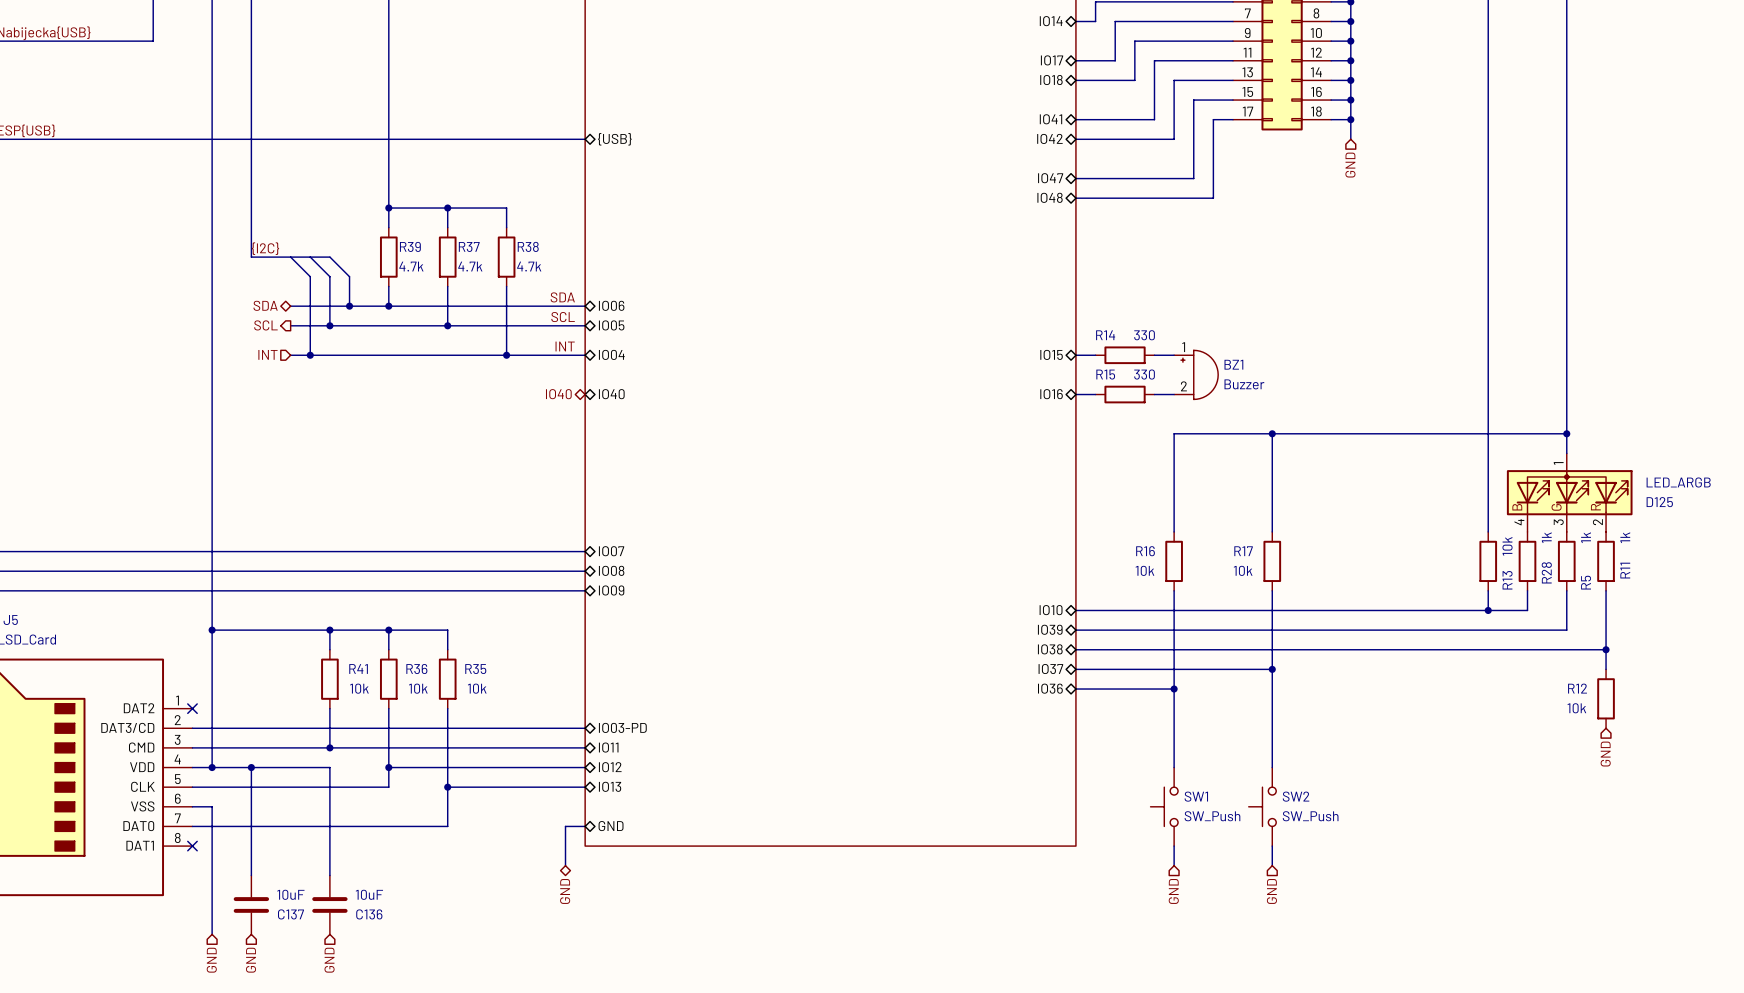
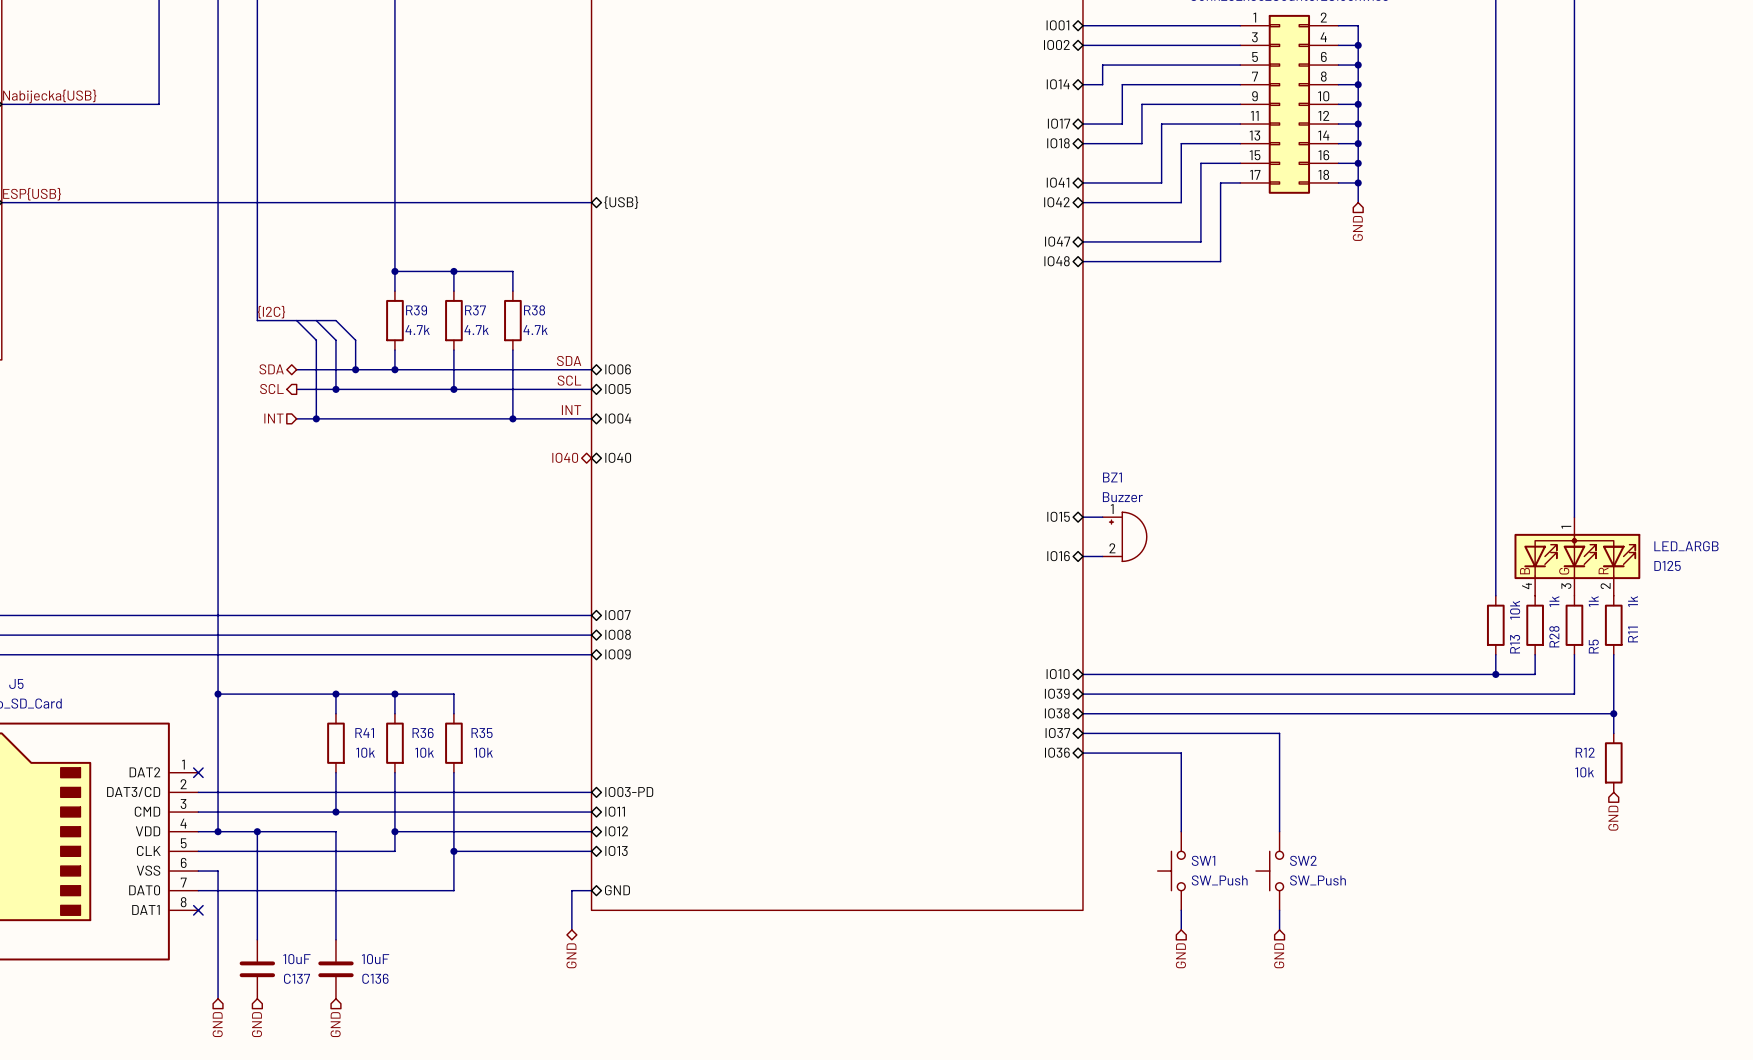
sheet pin position: IO15 (1051, 354) -> IO15 (1058, 516)
wire: (1075, 355) (1095, 355) -> (1082, 517) (1102, 517)
R14: 330 (1125, 355) -> none
wire: (1154, 355) (1174, 355) -> none
BZ1 name position: BZ1 (1233, 364) -> BZ1 (1112, 477)
BZ1 position: (1196, 374) -> (1124, 536)
BZ1 value position: Buzzer (1244, 384) -> Buzzer (1122, 497)
sheet pin position: IO16 (1051, 394) -> IO16 (1058, 556)
wire: (1075, 394) (1095, 394) -> (1082, 556) (1102, 556)
R15: 330 (1125, 394) -> none
wire: (1154, 394) (1174, 394) -> none
wire: (1272, 433) (1272, 531) -> none
junction: (1272, 433) -> none
wire: (1566, 433) (1174, 433) (1174, 531) -> none
junction: (1566, 433) -> none
R16: 10k (1174, 561) -> none
R17: 10k (1272, 561) -> none
wire: (1174, 590) (1174, 689) -> none
wire: (1272, 590) (1272, 669) -> none
junction: (1272, 669) -> none
junction: (1174, 689) -> none

